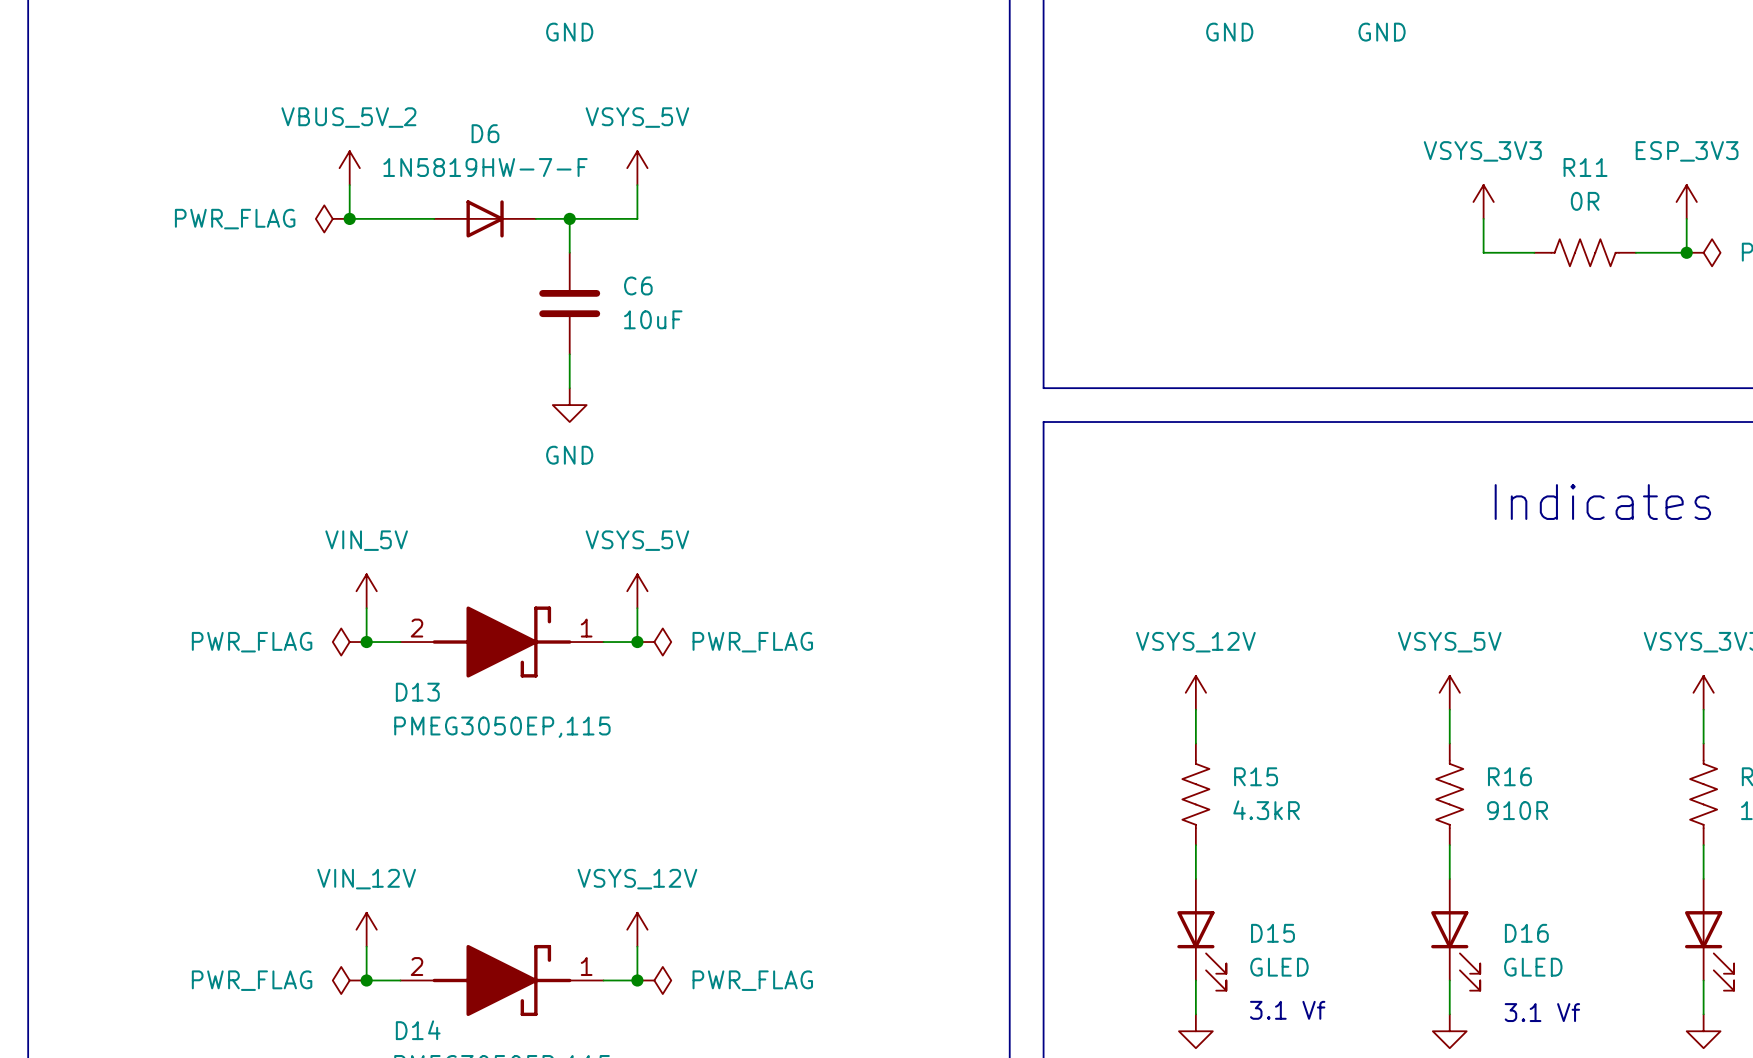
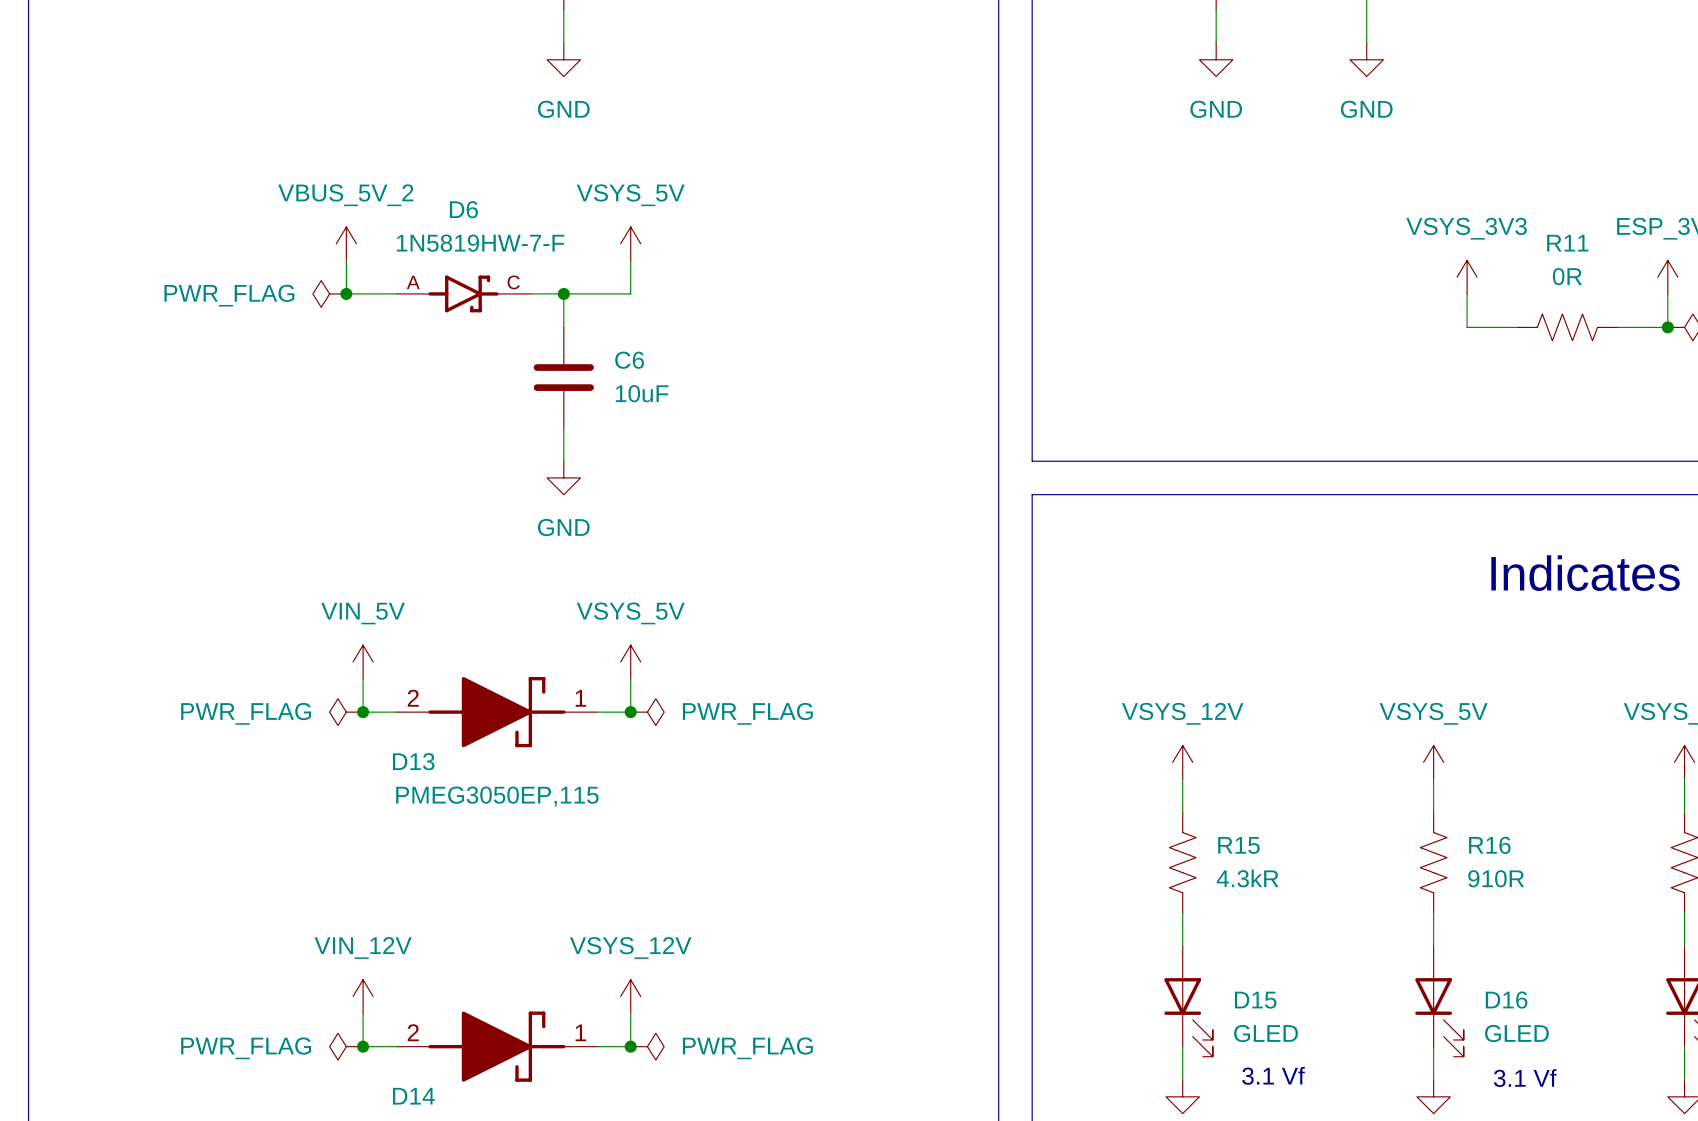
D6 symbol: [434, 200, 536, 238] -> [396, 275, 531, 313]

